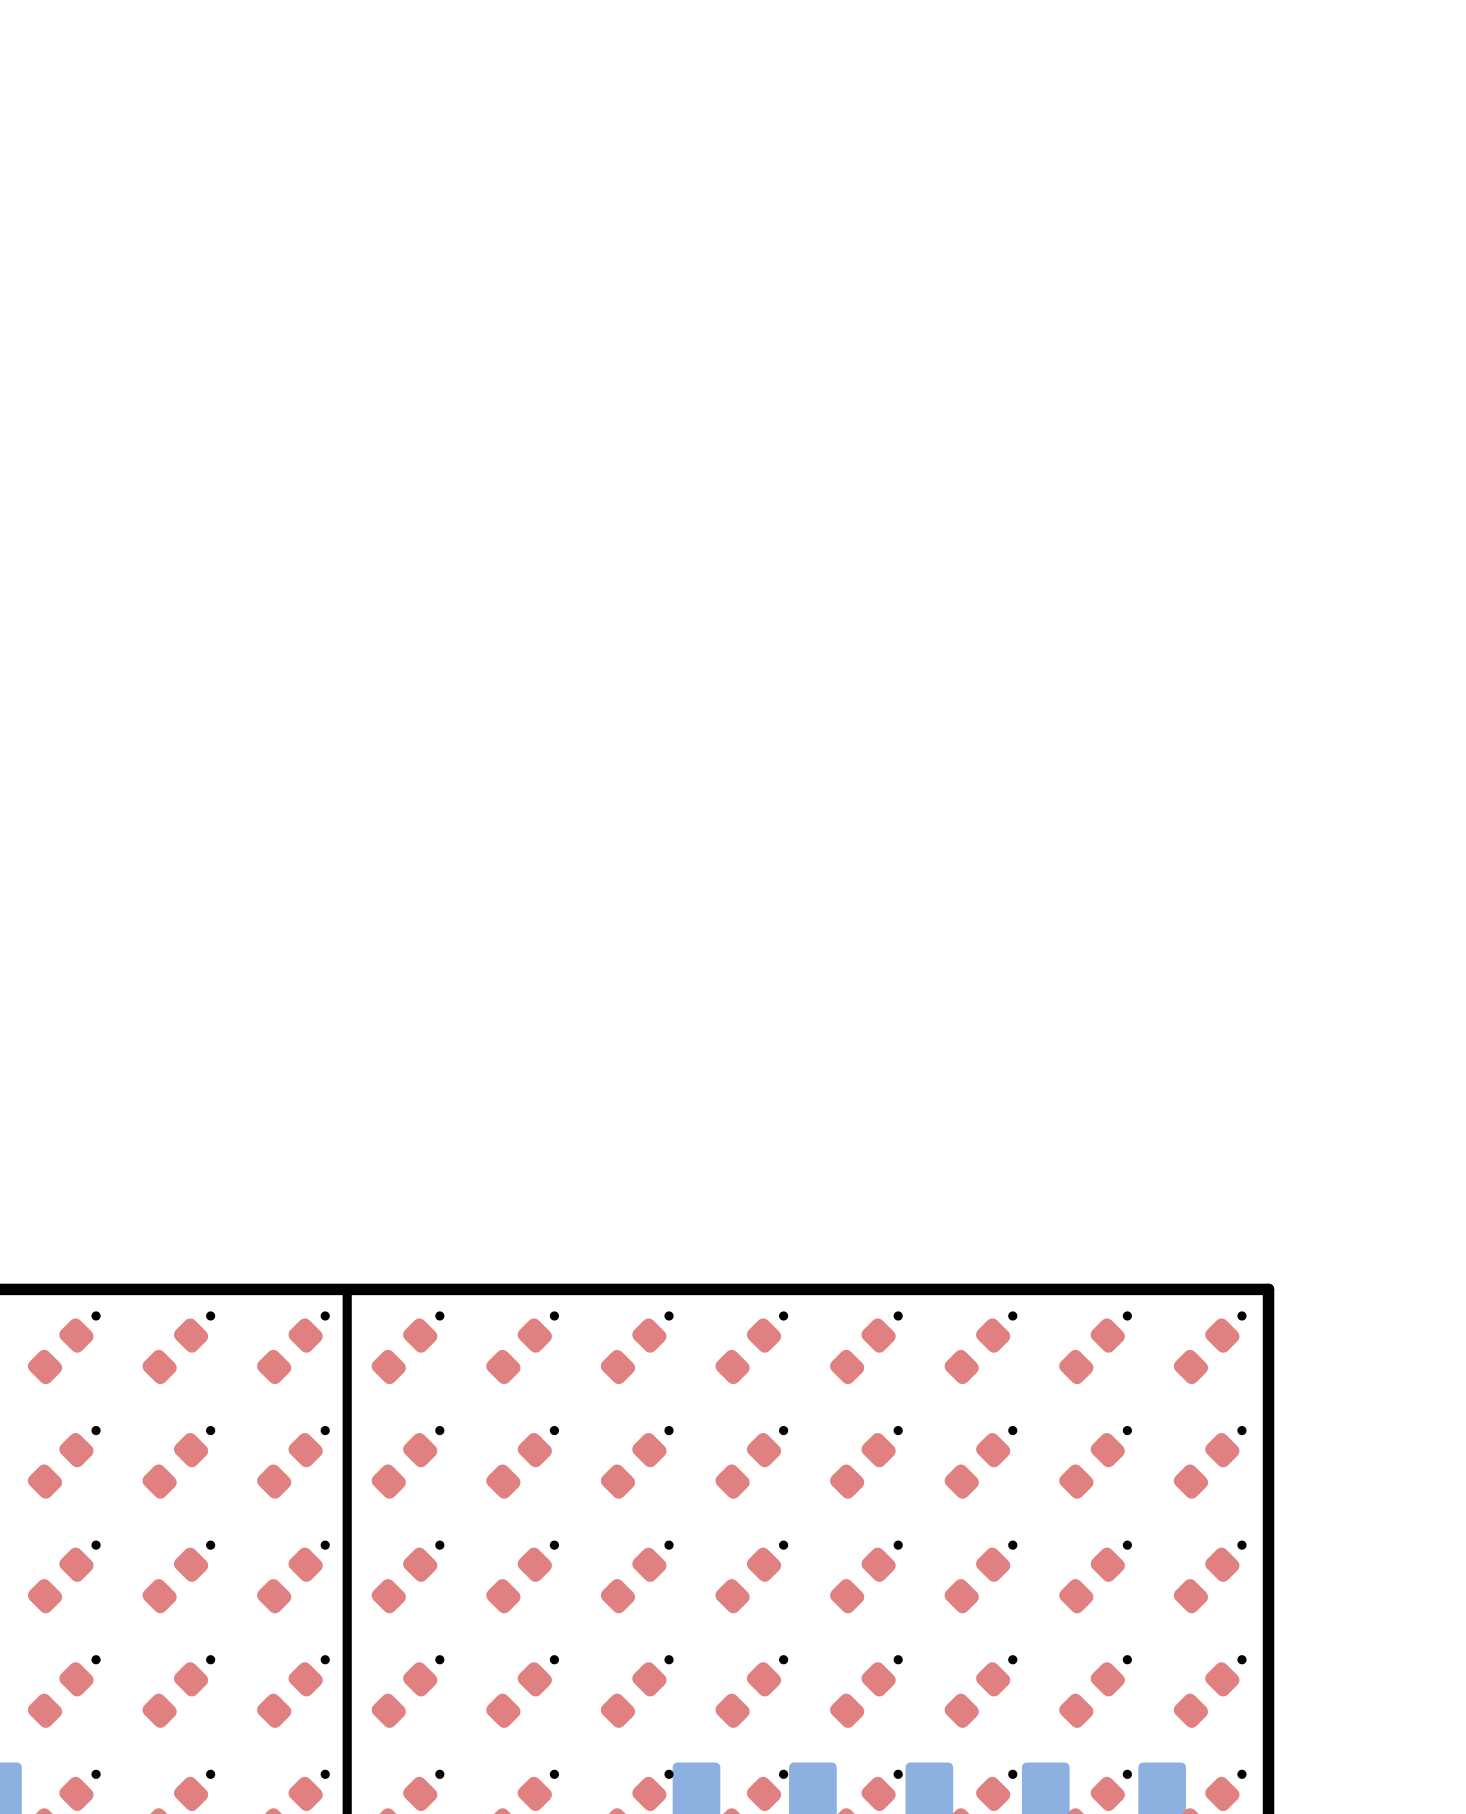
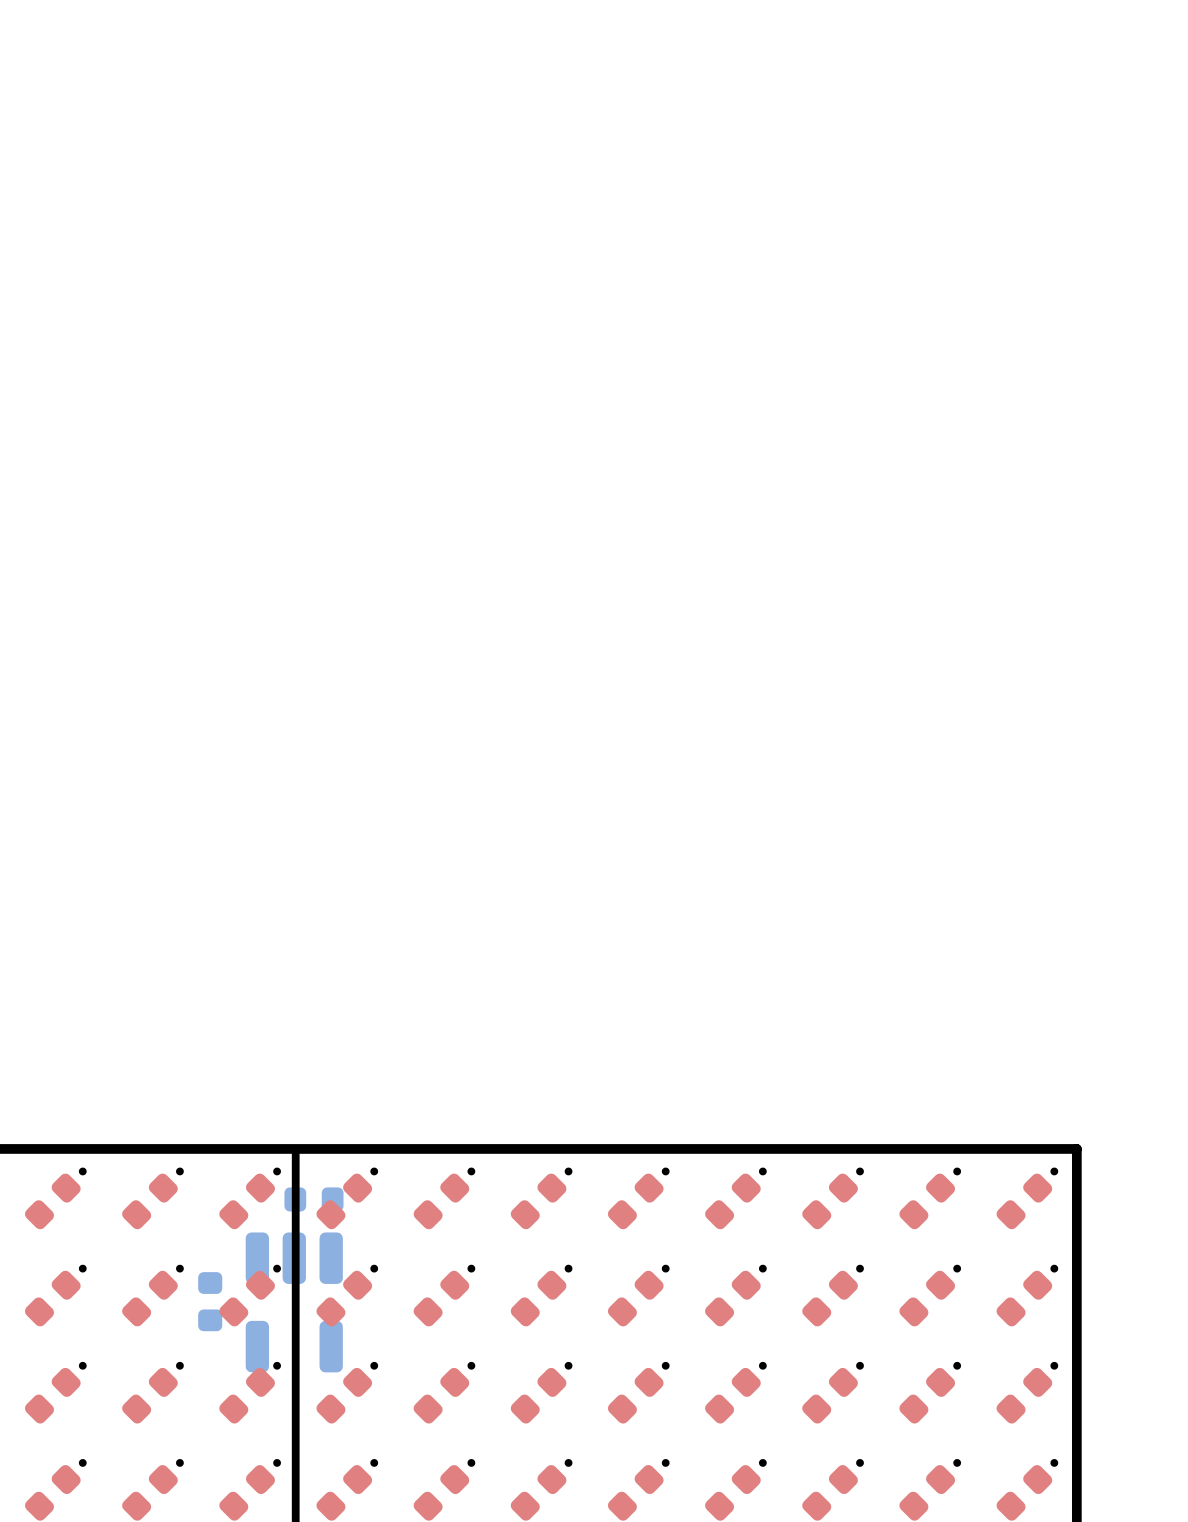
part: none -> (313, 1199)
part: none -> (210, 1301)
part: none -> (294, 1302)

